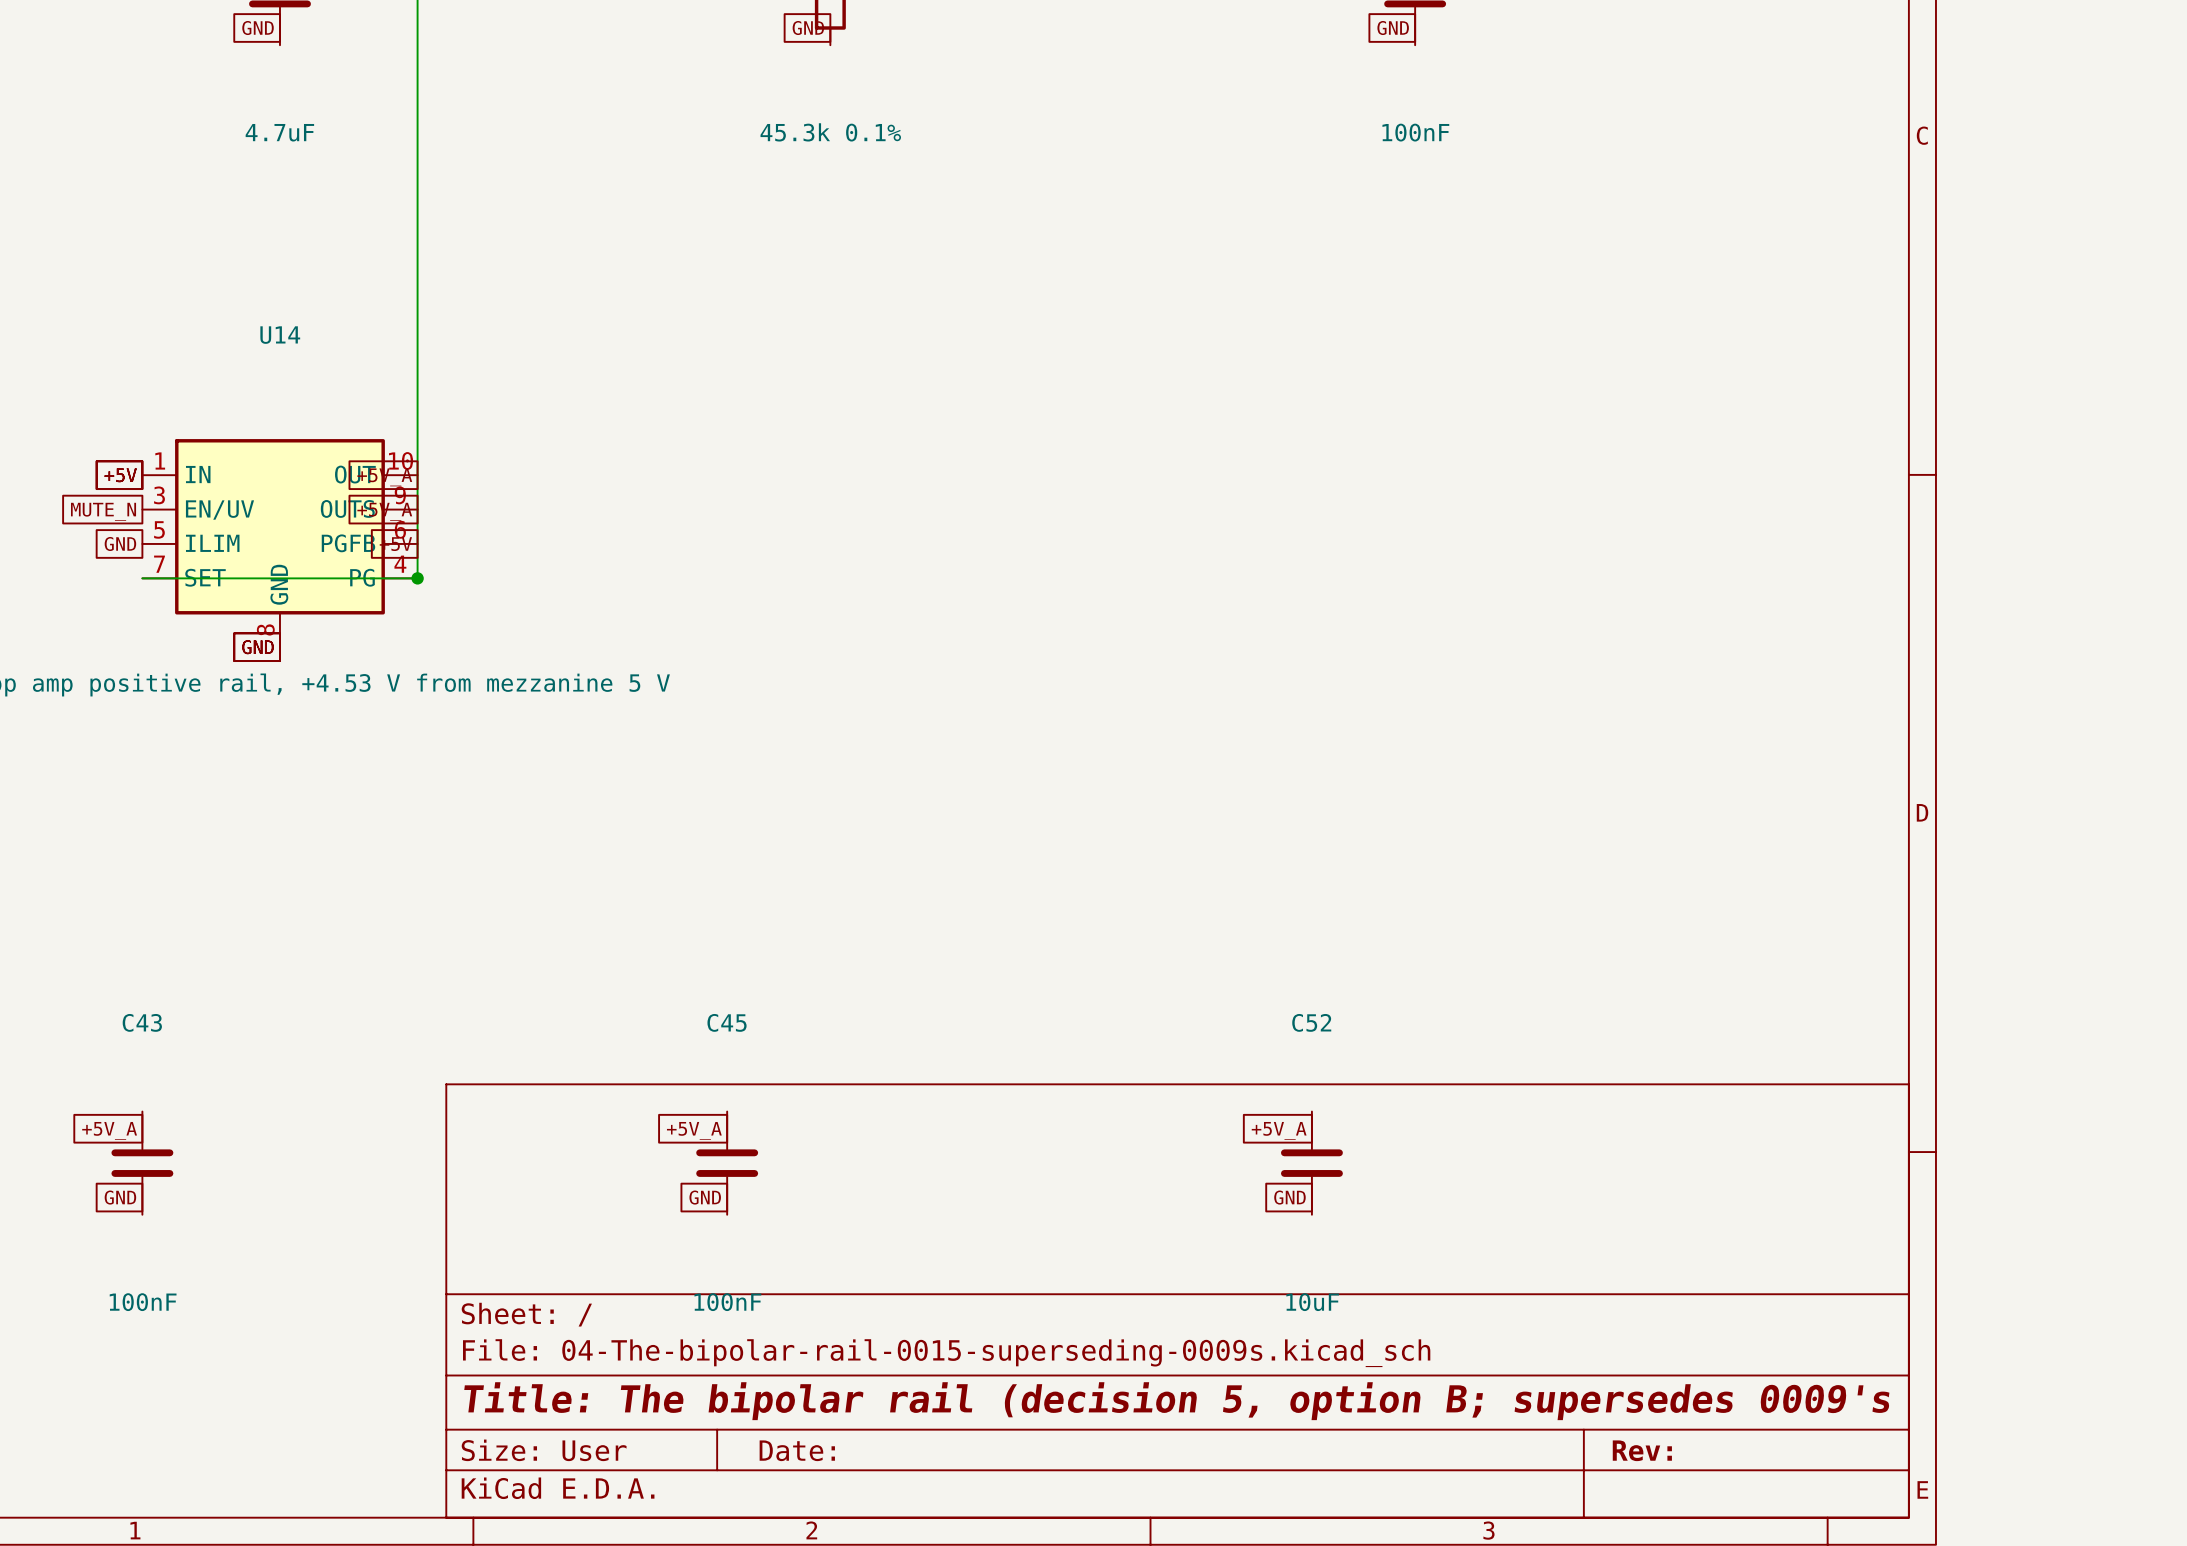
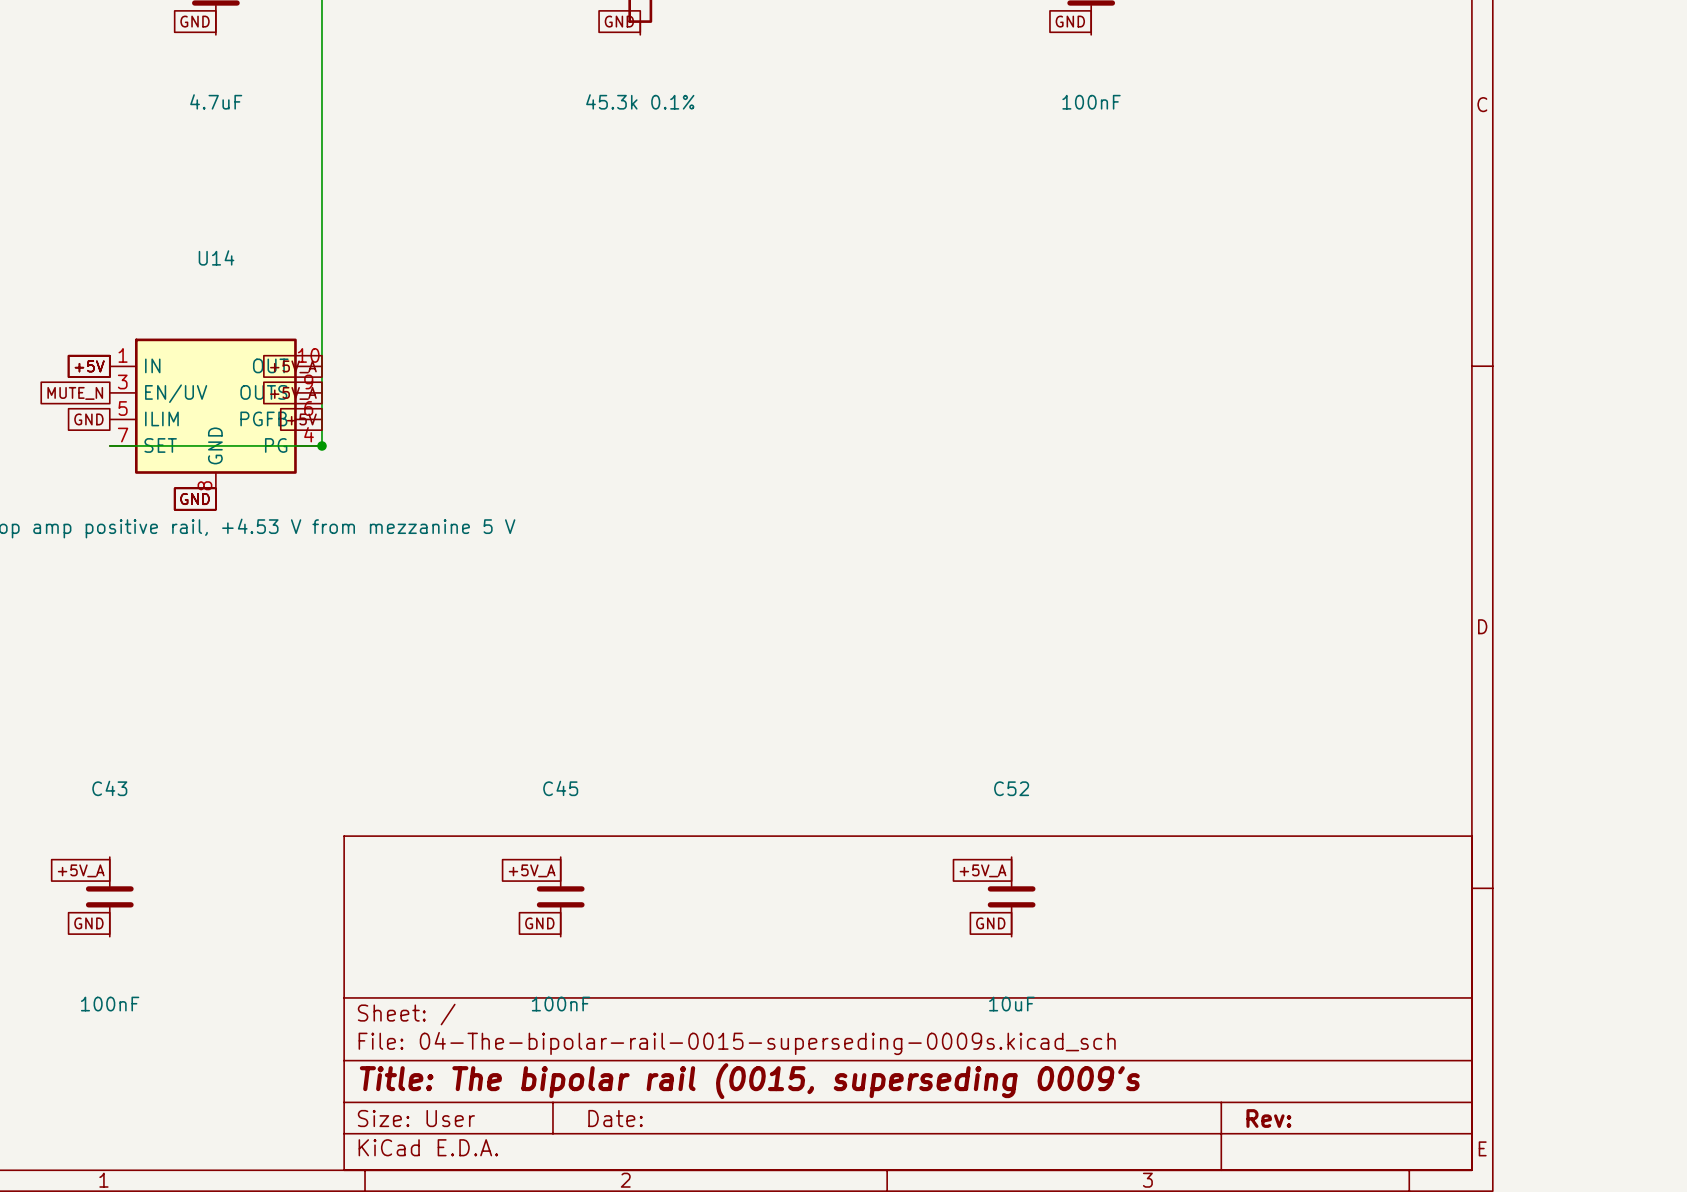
title block: Title: The bipolar rail (decision 5, option B; supersedes 0009's (1176, 1401) -> Title: The bipolar rail (0015, superseding 0009's (749, 1081)

